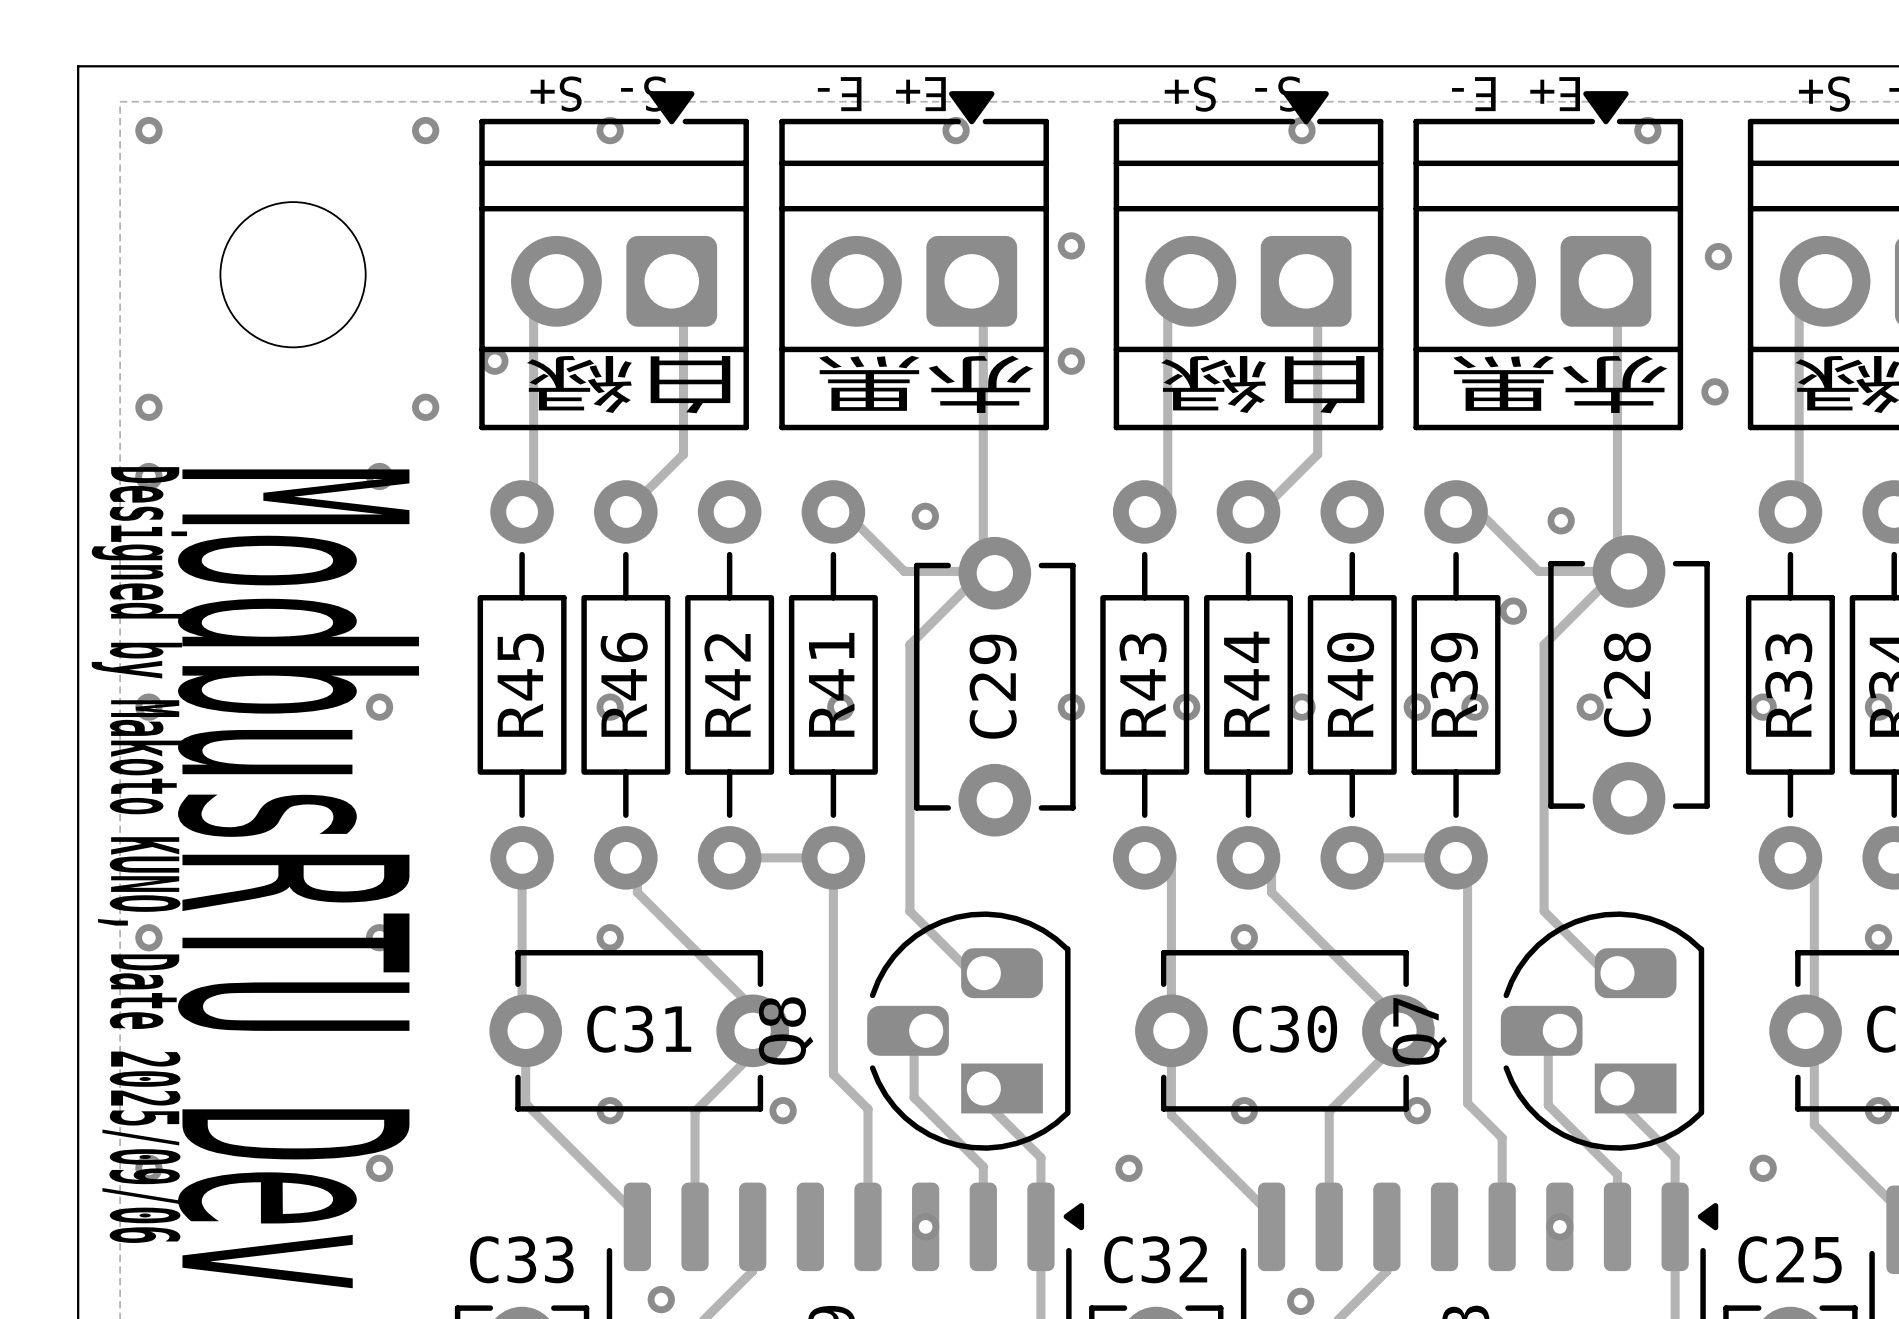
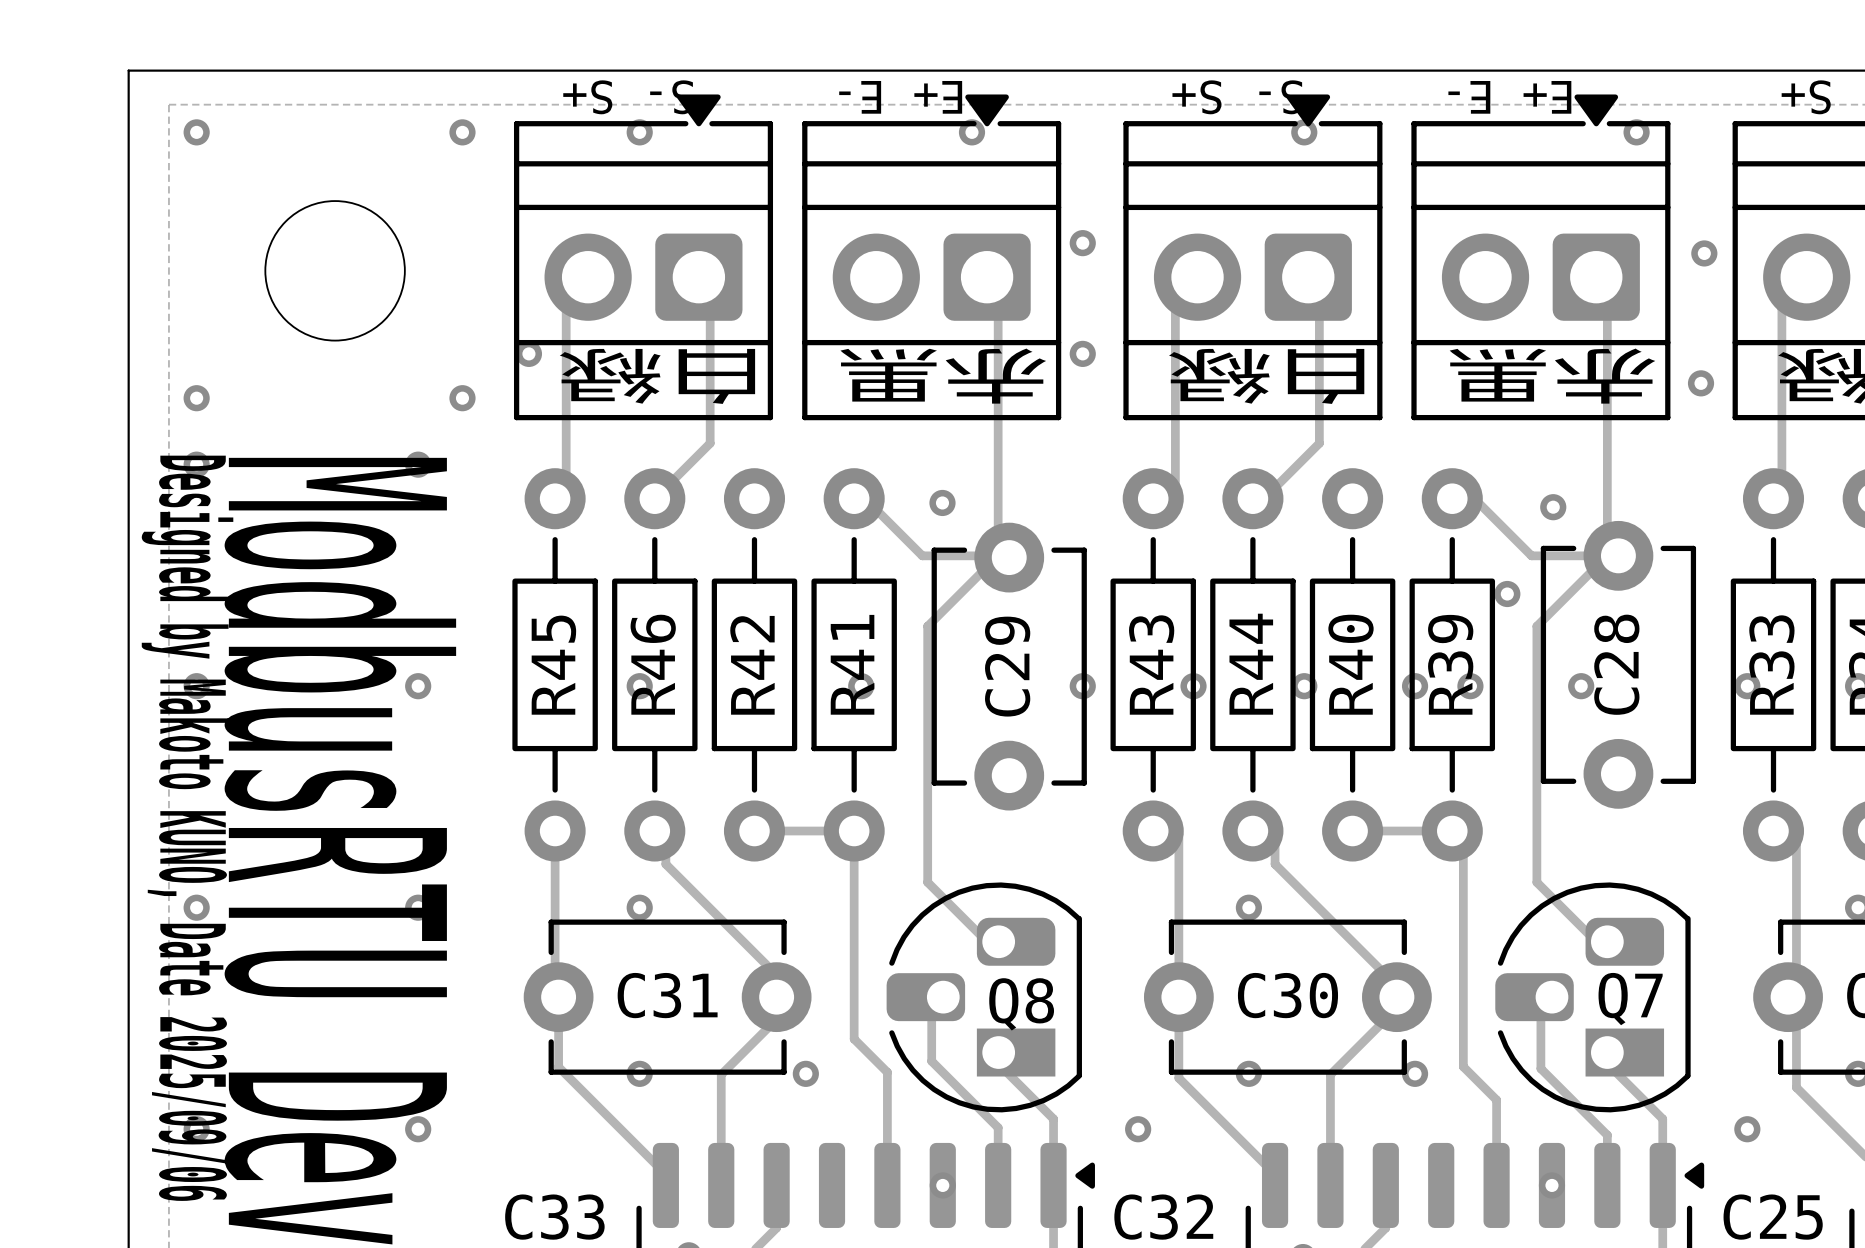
Q8 name rotation: 0° (786, 1031) -> 90° clockwise (1021, 1004)
Q8 name position: Q8 (786, 1031) -> Q8 (1021, 1004)
Q7 name rotation: 0° (1419, 1031) -> 90° clockwise (1630, 999)
Q7 name position: Q7 (1419, 1031) -> Q7 (1630, 999)

